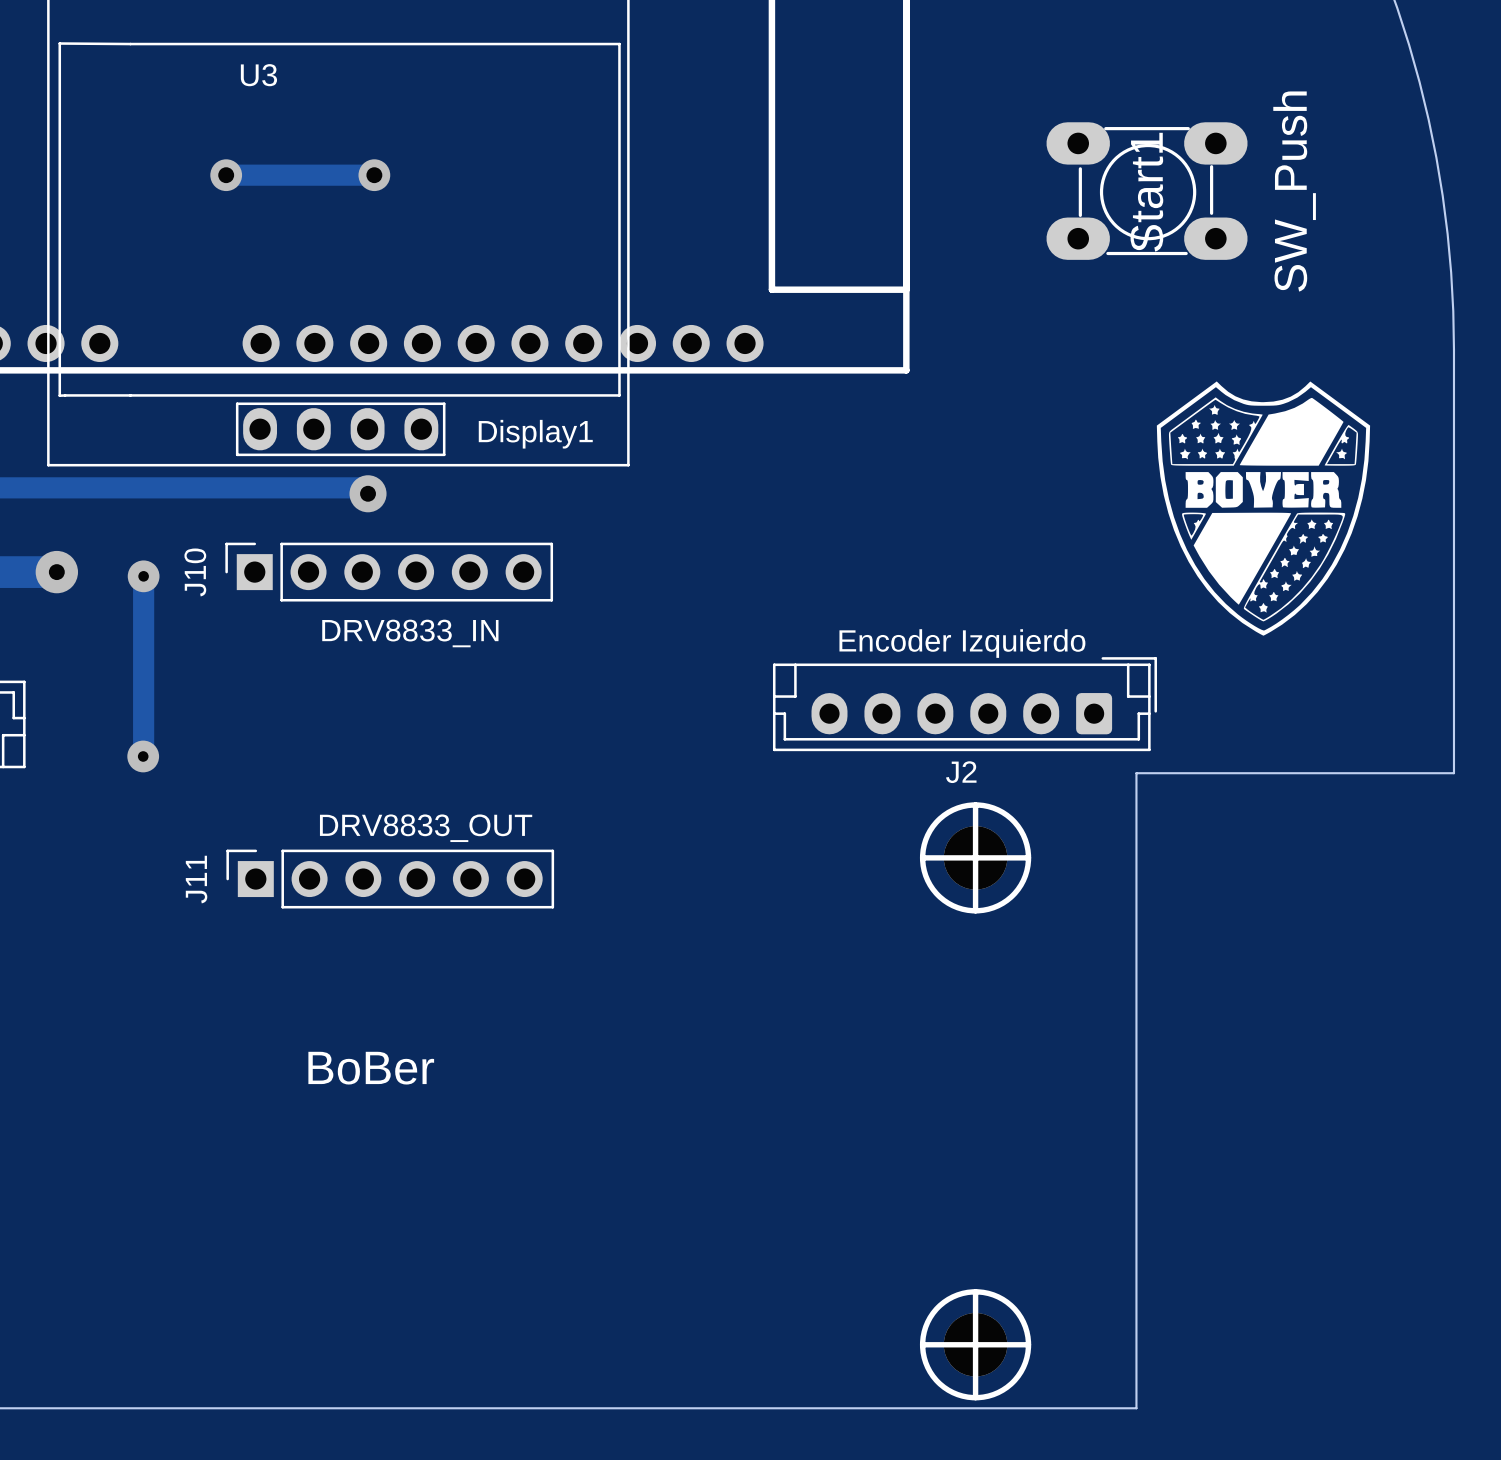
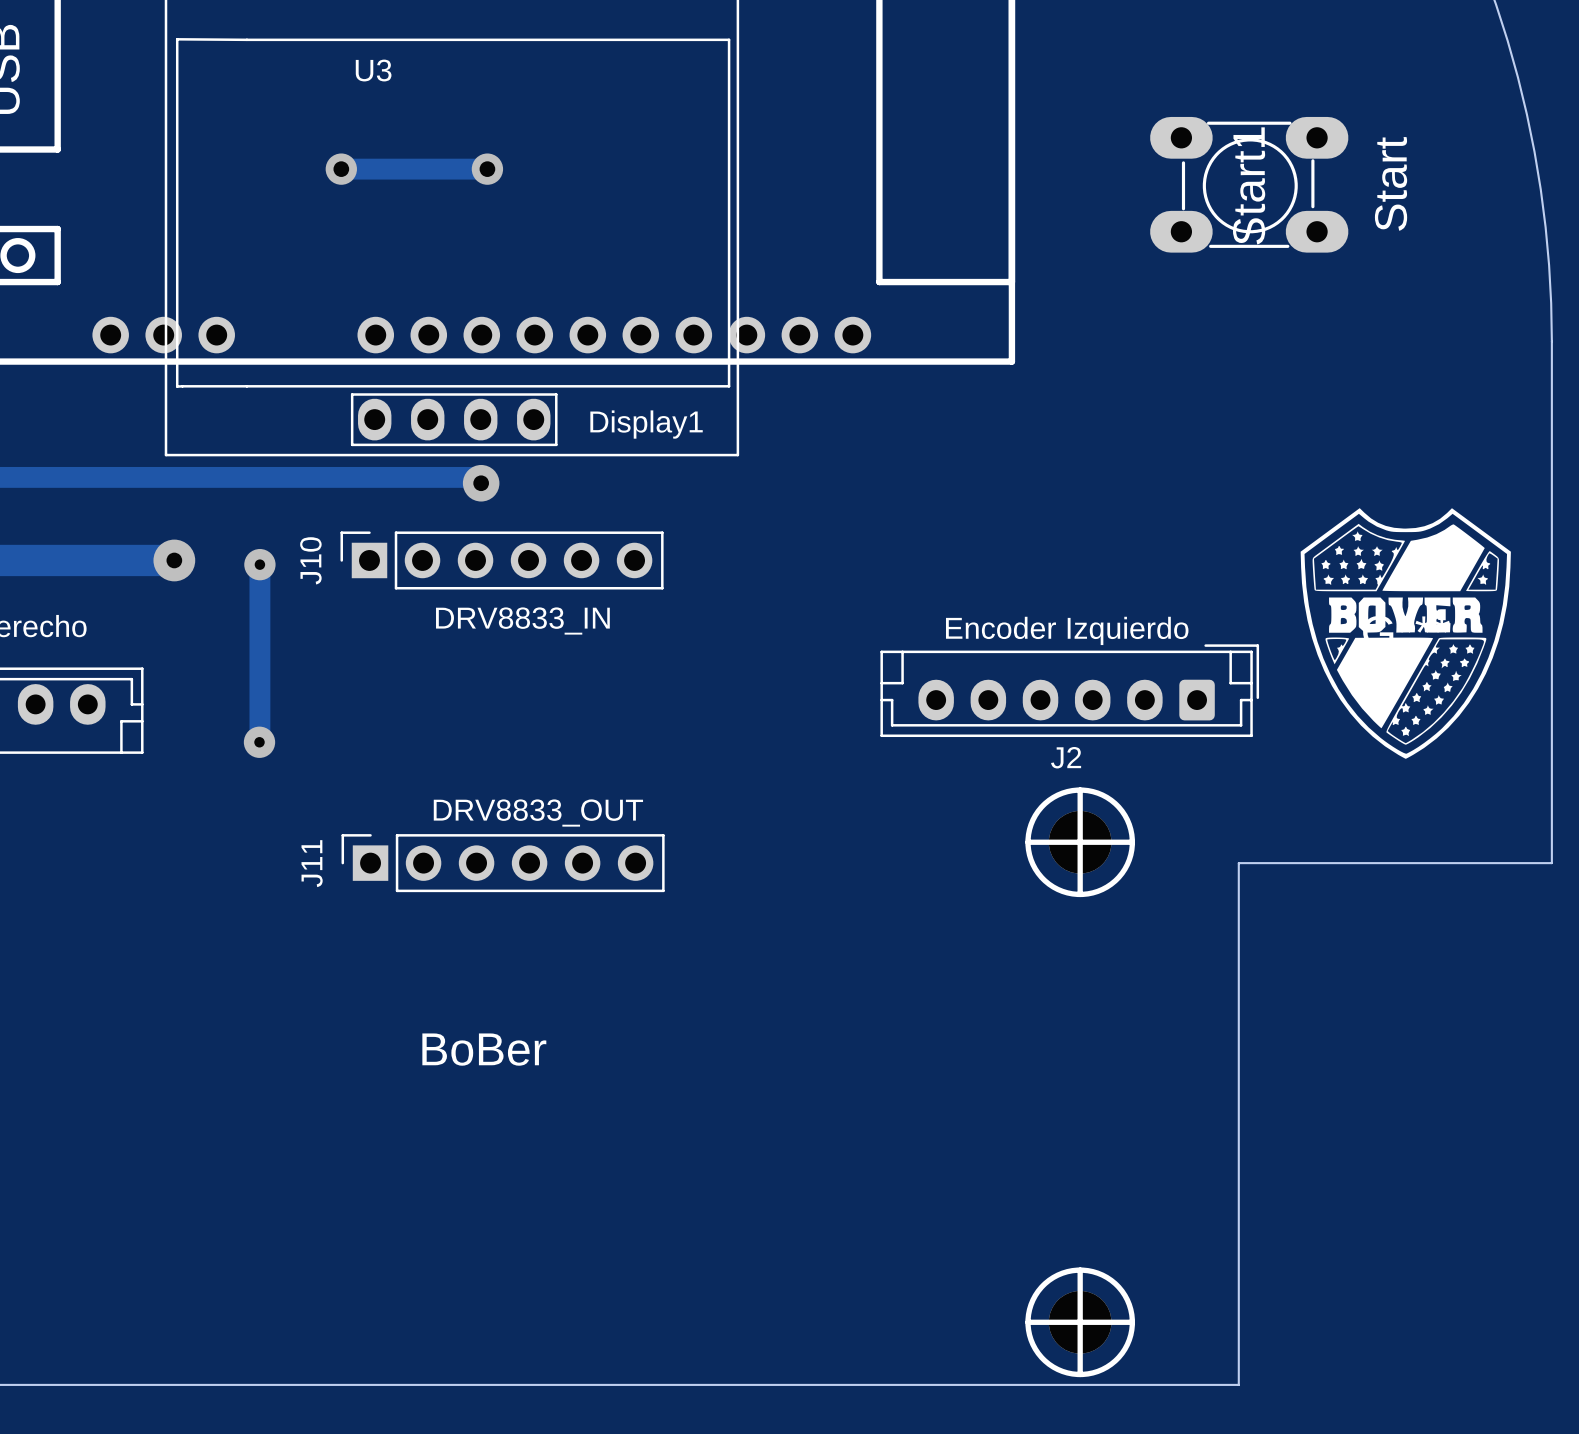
Start1 value: SW_Push (1294, 191) -> Start (1391, 183)
drawing: [1156, 381, 1371, 636] -> none
part: none -> (1405, 633)
board edge: (1453, 773) (1136, 773) (1136, 879) -> (1551, 758) (1551, 863) (1238, 863)

